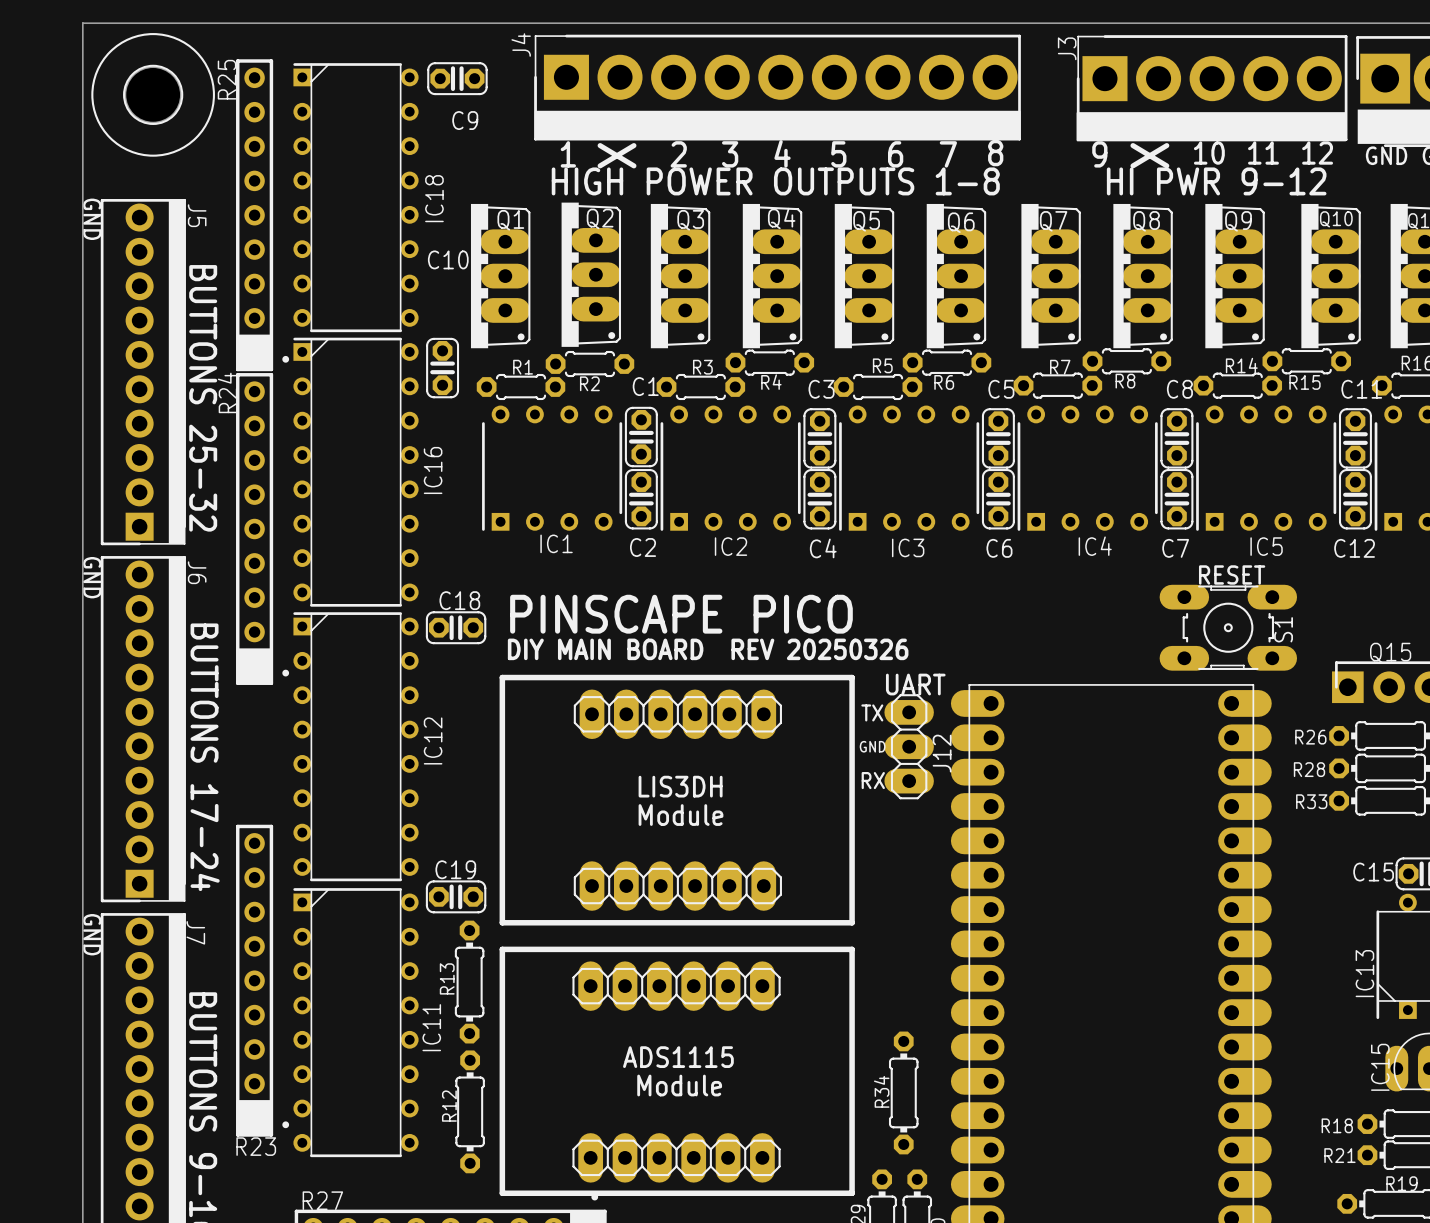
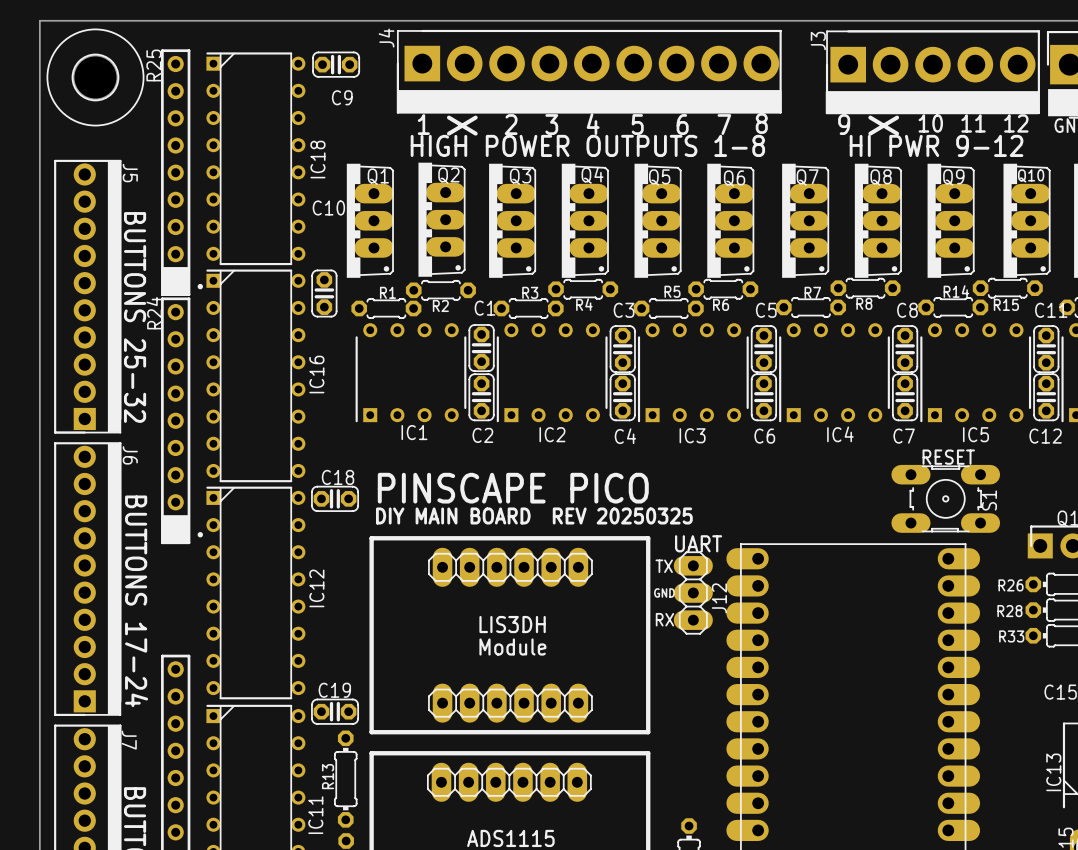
text: GND (92, 219) -> none
text: GND (92, 577) -> none
text: DIY MAIN BOARD REV 20250326 (708, 649) -> DIY MAIN BOARD REV 20250325 (534, 515)
text: GND (92, 934) -> none

